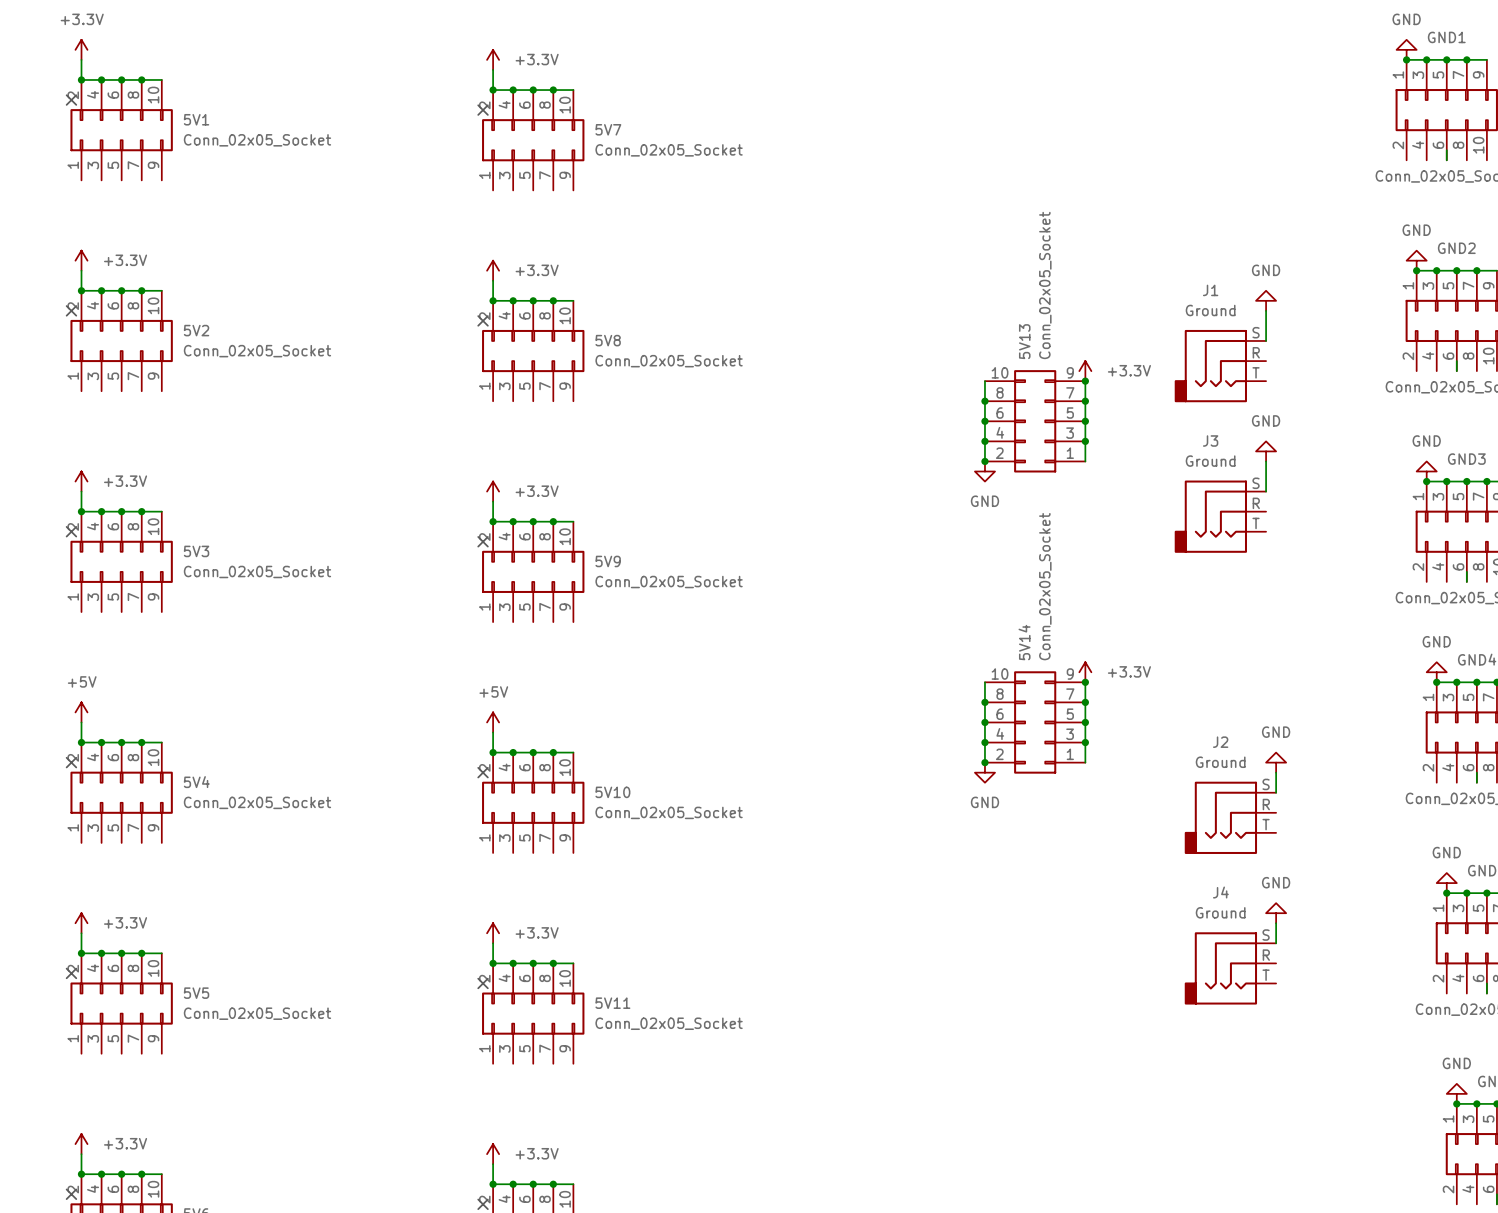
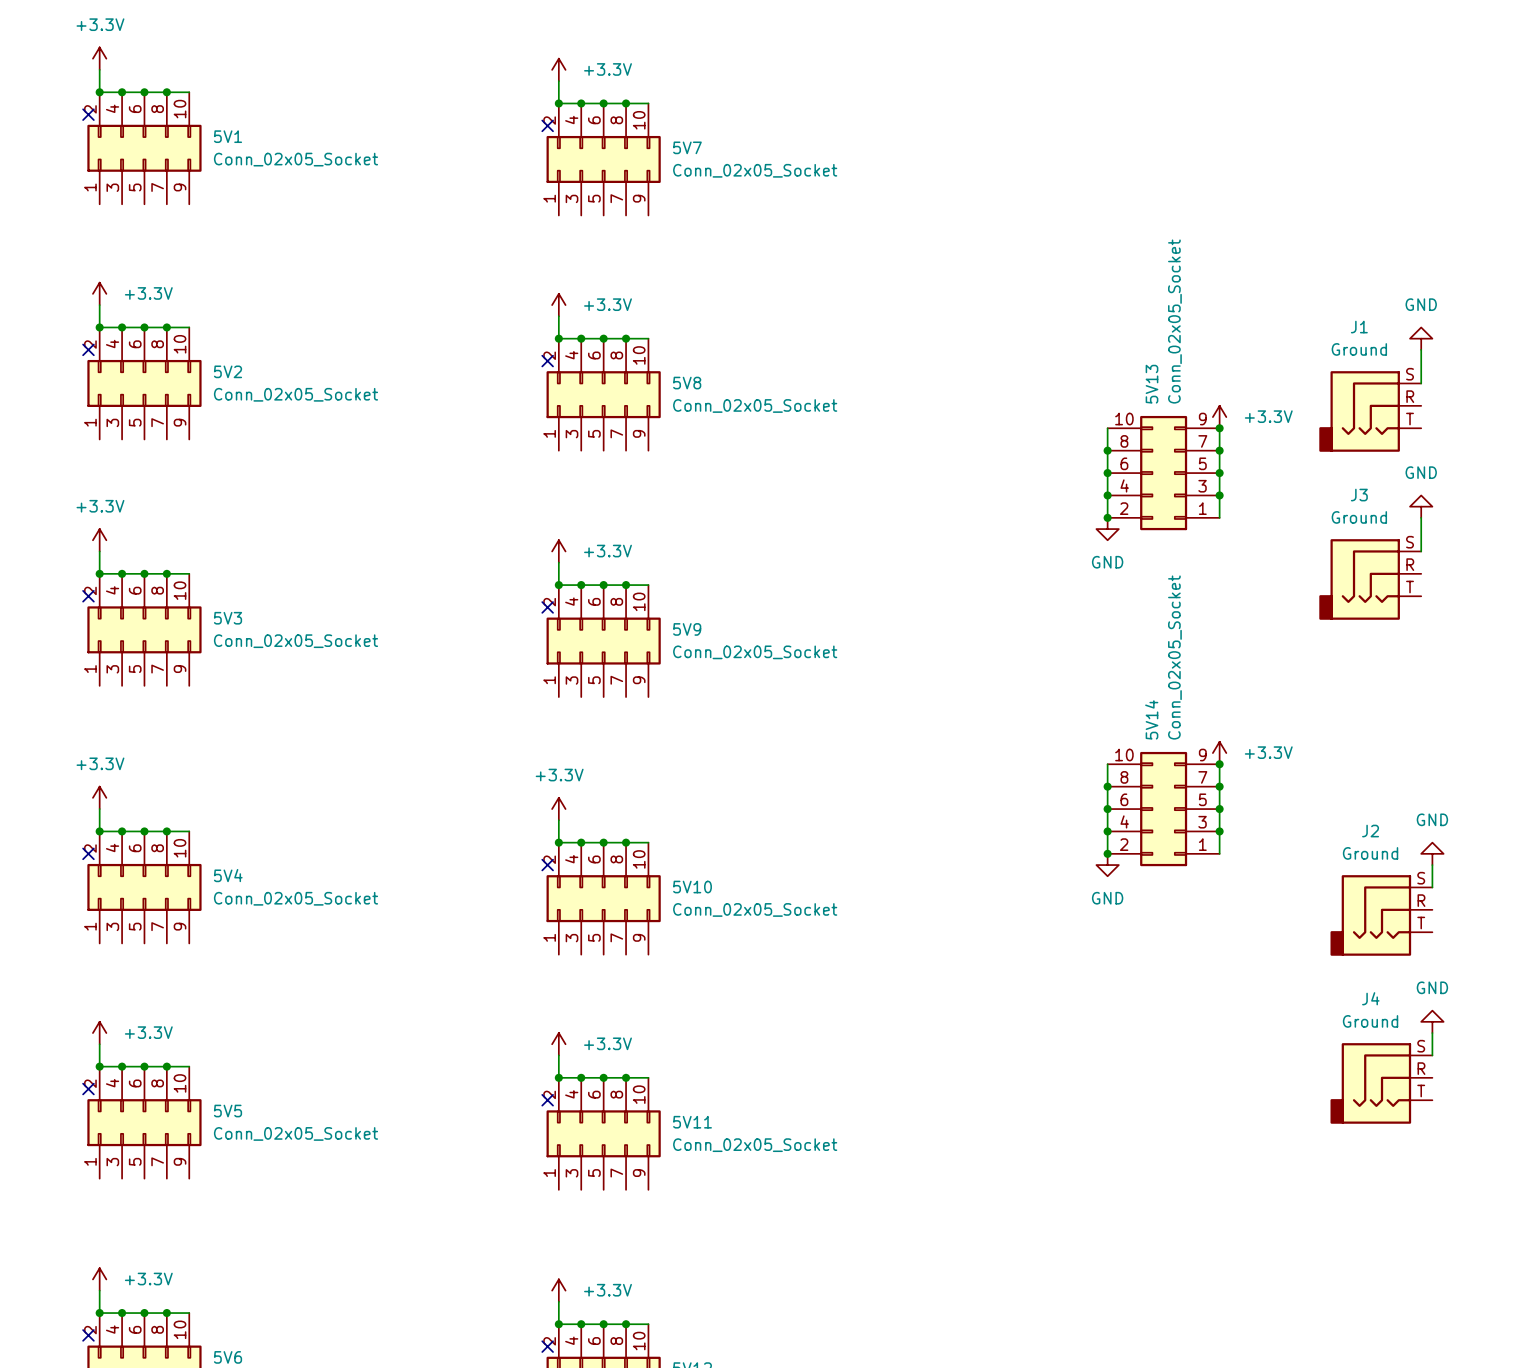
power symbol text position: +3.3V (125, 481) -> +3.3V (100, 506)
power symbol: +5V (81, 712) -> +3.3V (99, 797)
power symbol: +5V (493, 722) -> +3.3V (558, 809)

